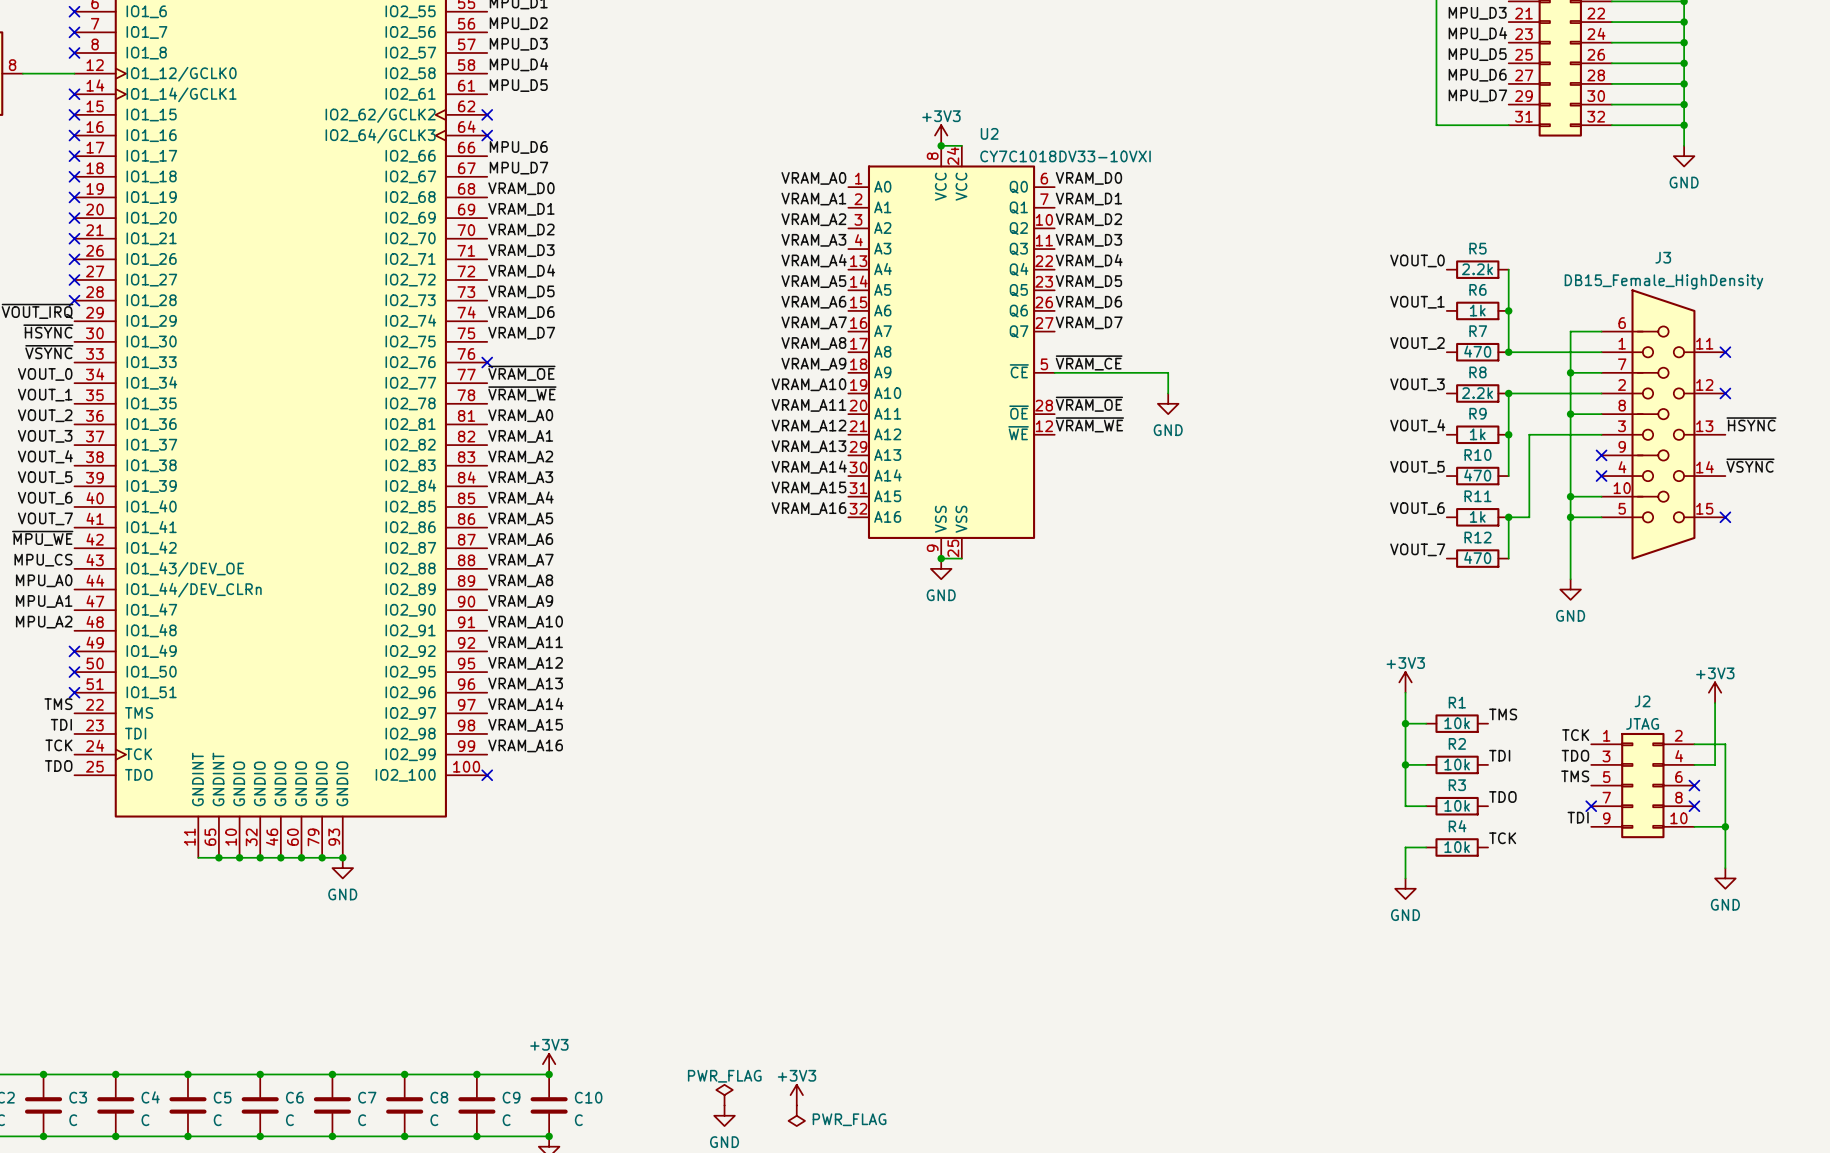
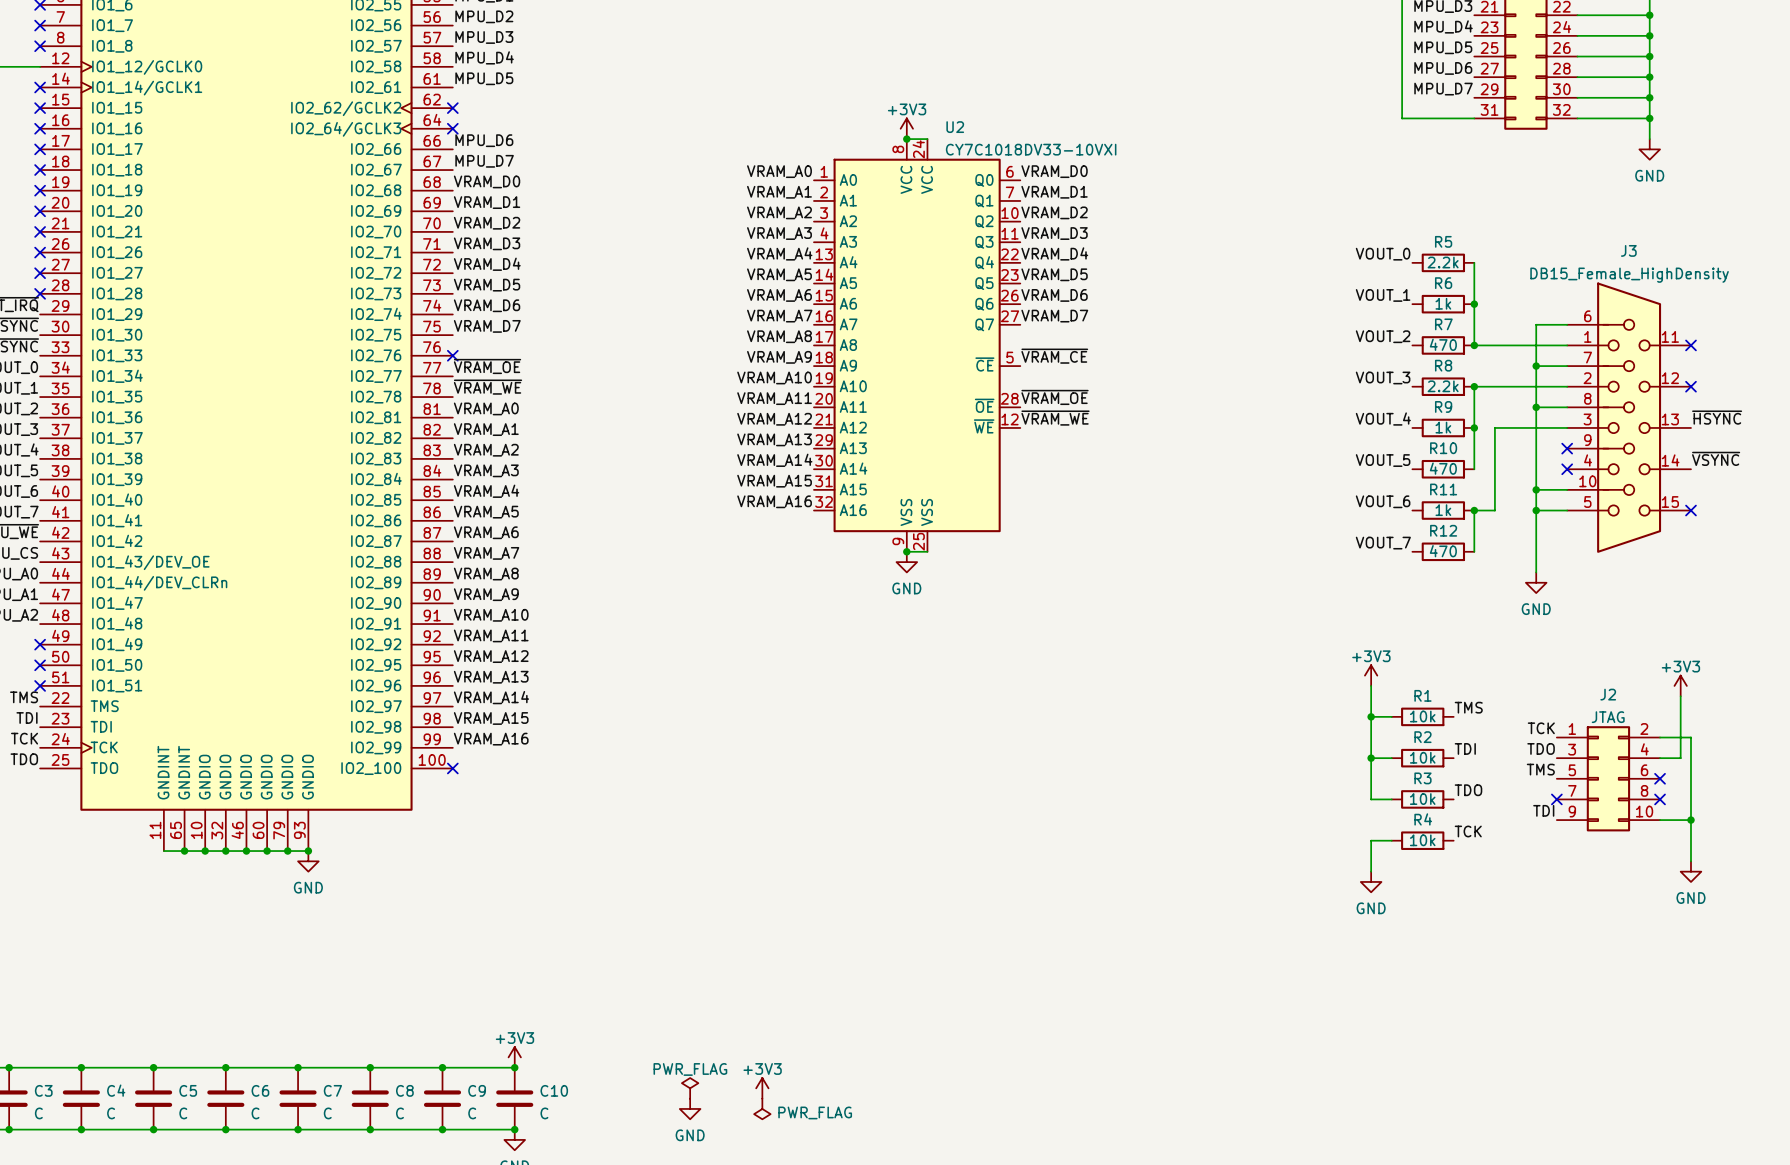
wire: (1054, 372) (1168, 372) (1168, 393) -> none
power symbol: GND (1168, 403) -> none

